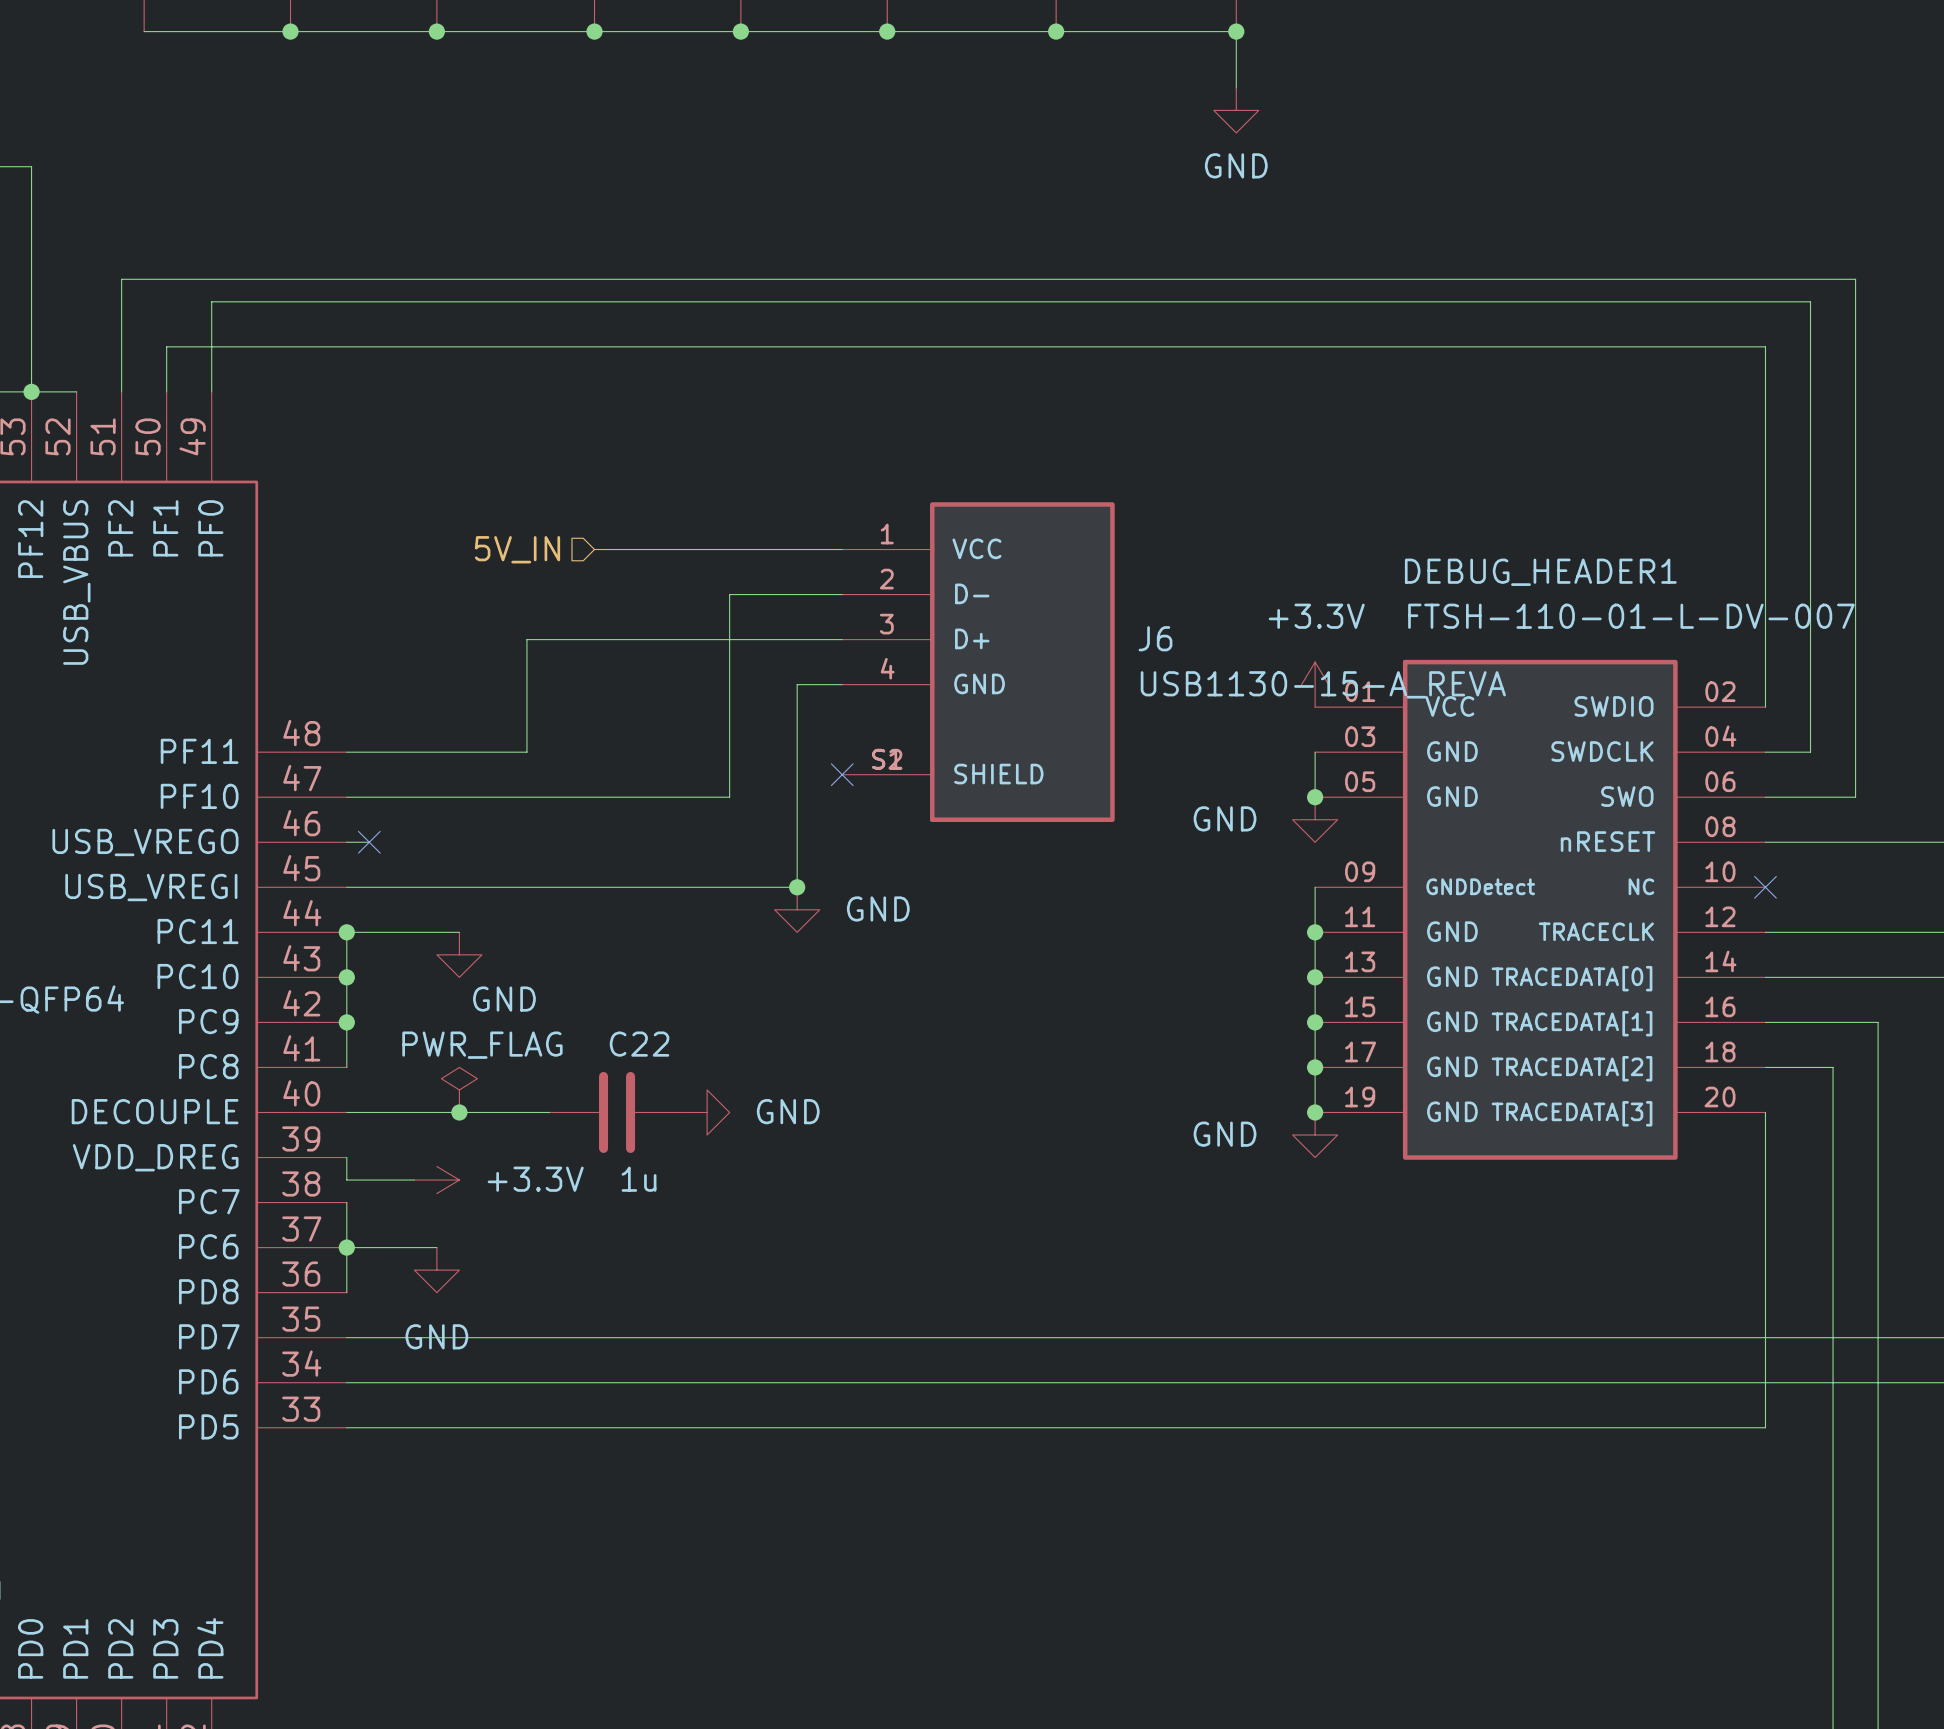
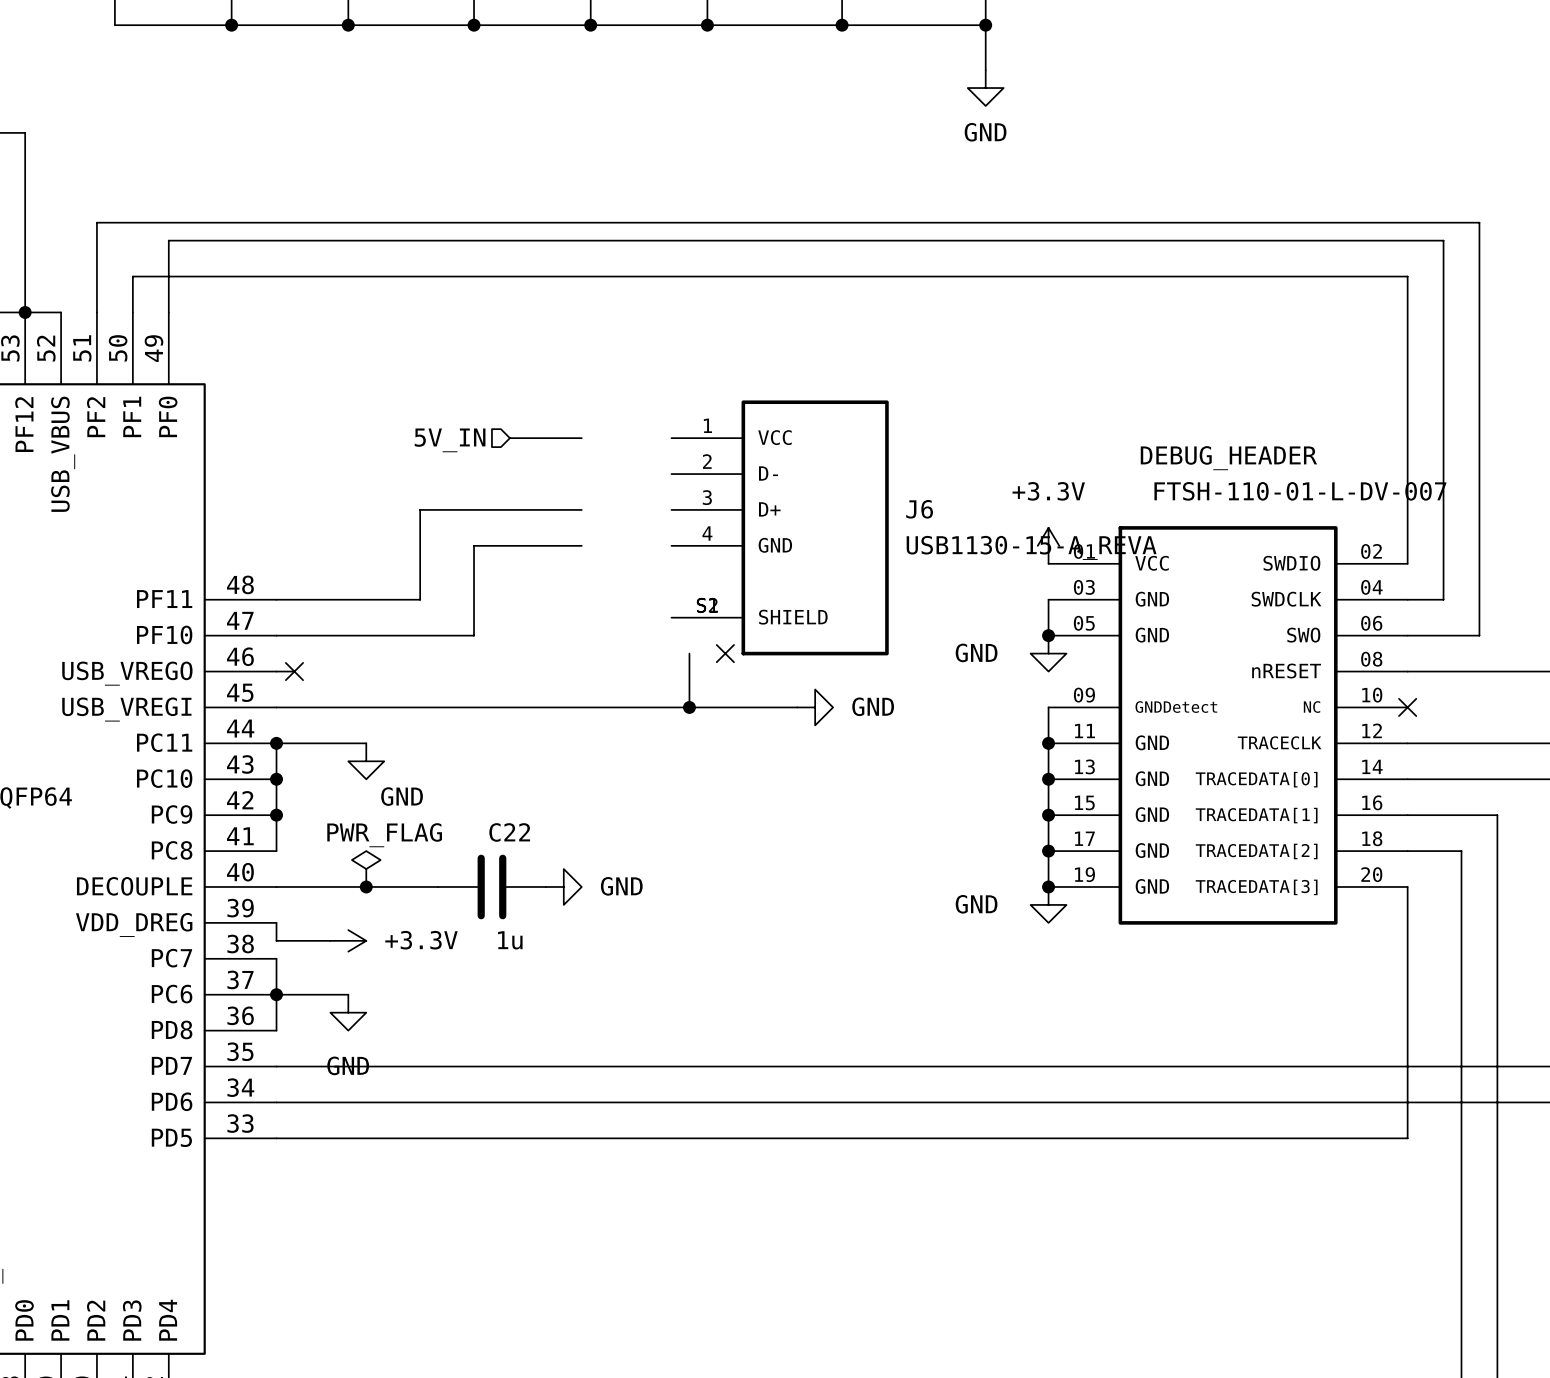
hierarchical label position: 5V_IN (517, 549) -> 5V_IN (450, 440)
wire: (594, 549) (639, 549) -> none
wire: (729, 549) (842, 549) -> none
DEBUG_HEADER1 name: DEBUG_HEADER1 (1540, 572) -> DEBUG_HEADER (1228, 458)
wire: (842, 594) (729, 594) (729, 797) (594, 797) -> (581, 545) (474, 545) (474, 635)
wire: (729, 639) (842, 639) -> none
wire: (842, 684) (797, 684) (797, 887) -> (797, 707) (635, 707)
no-connect mark position: (842, 774) -> (725, 653)
wire: none -> (689, 653) (689, 707)
junction position: (797, 887) -> (689, 707)
power symbol rotation: 0° (797, 909) -> 90° counterclockwise (815, 707)
power symbol position: GND (797, 909) -> GND (815, 707)

